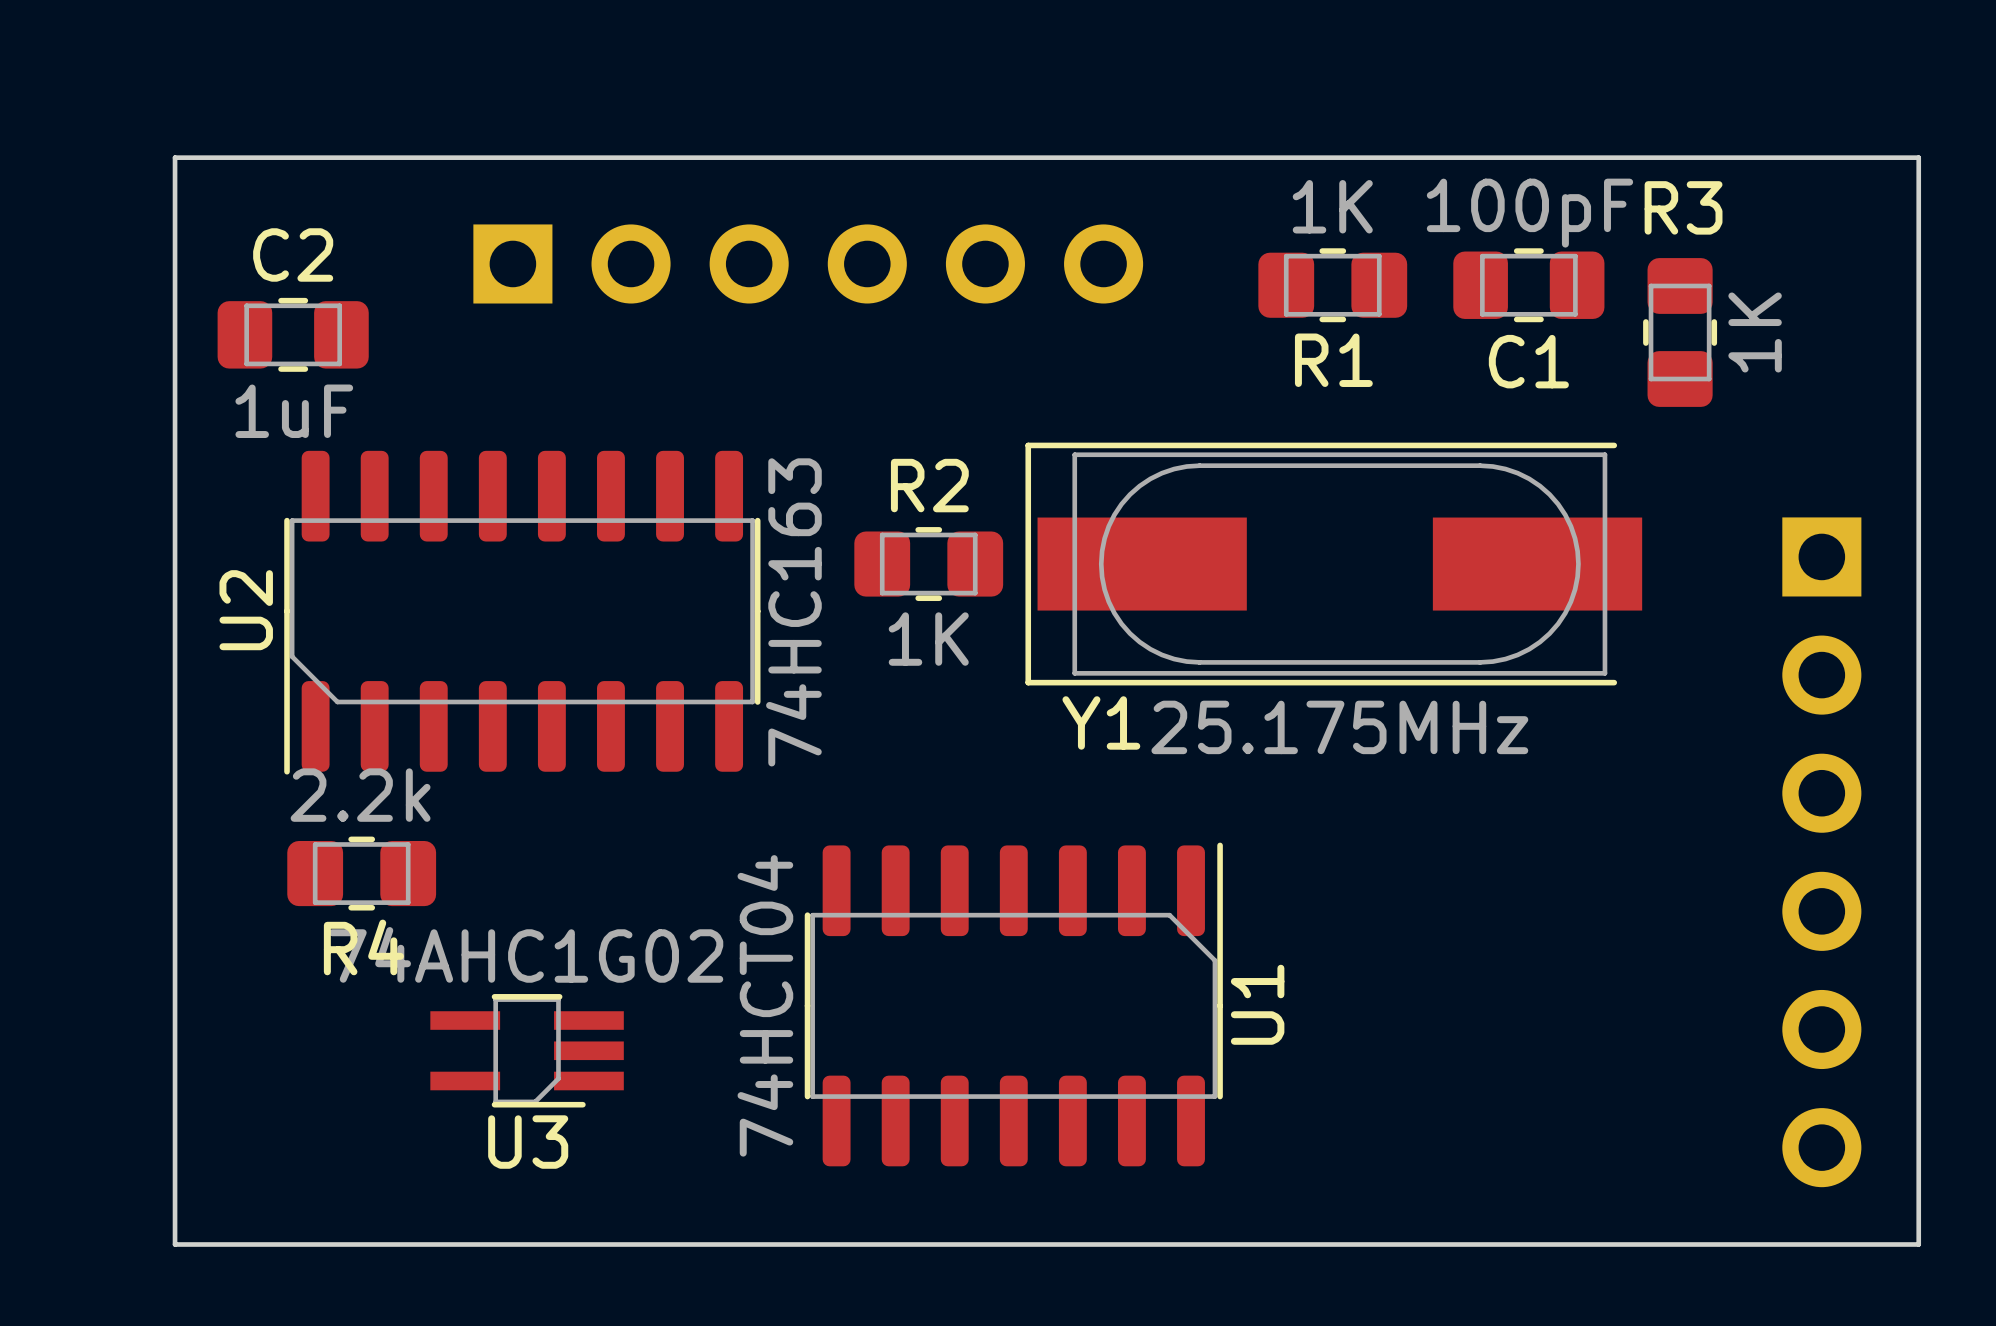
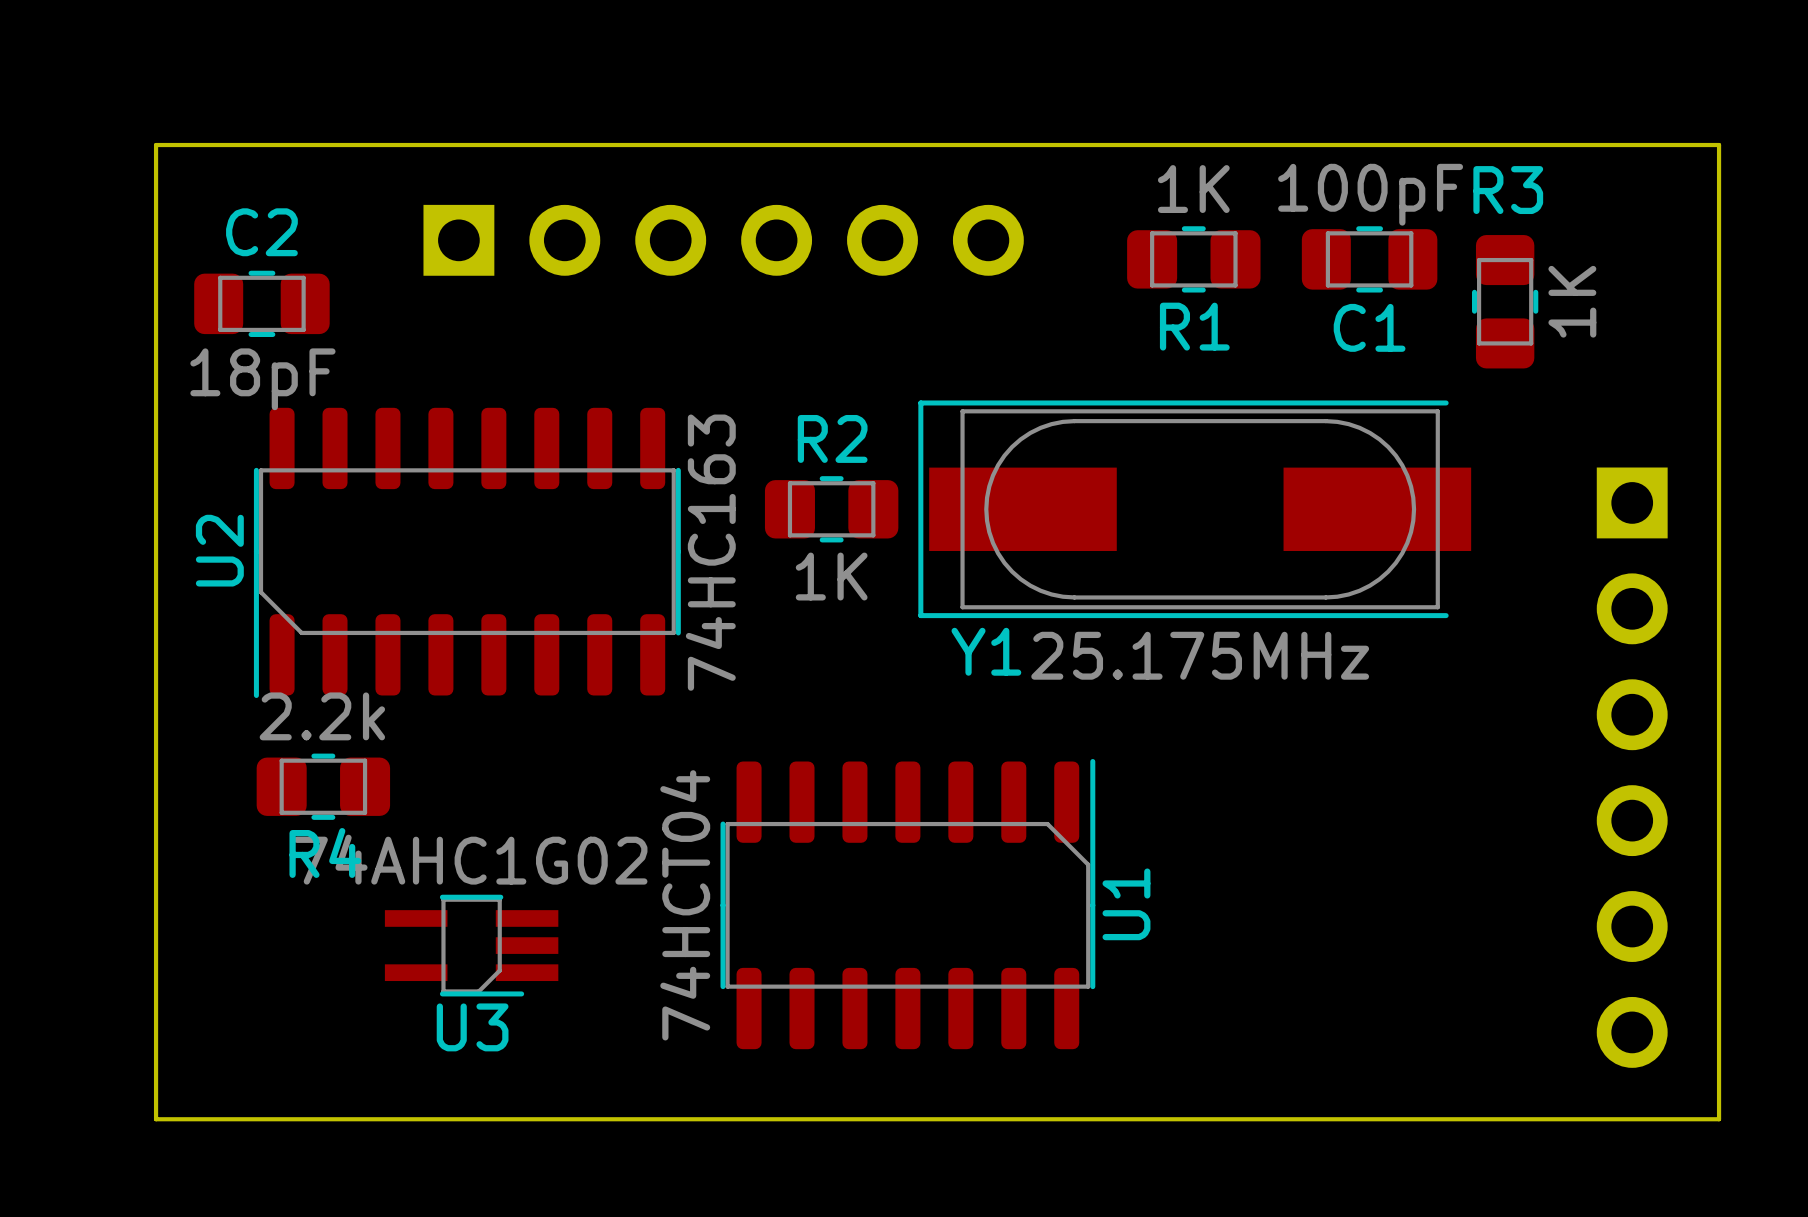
C2 value: 1uF (294, 411) -> 18pF (262, 379)

